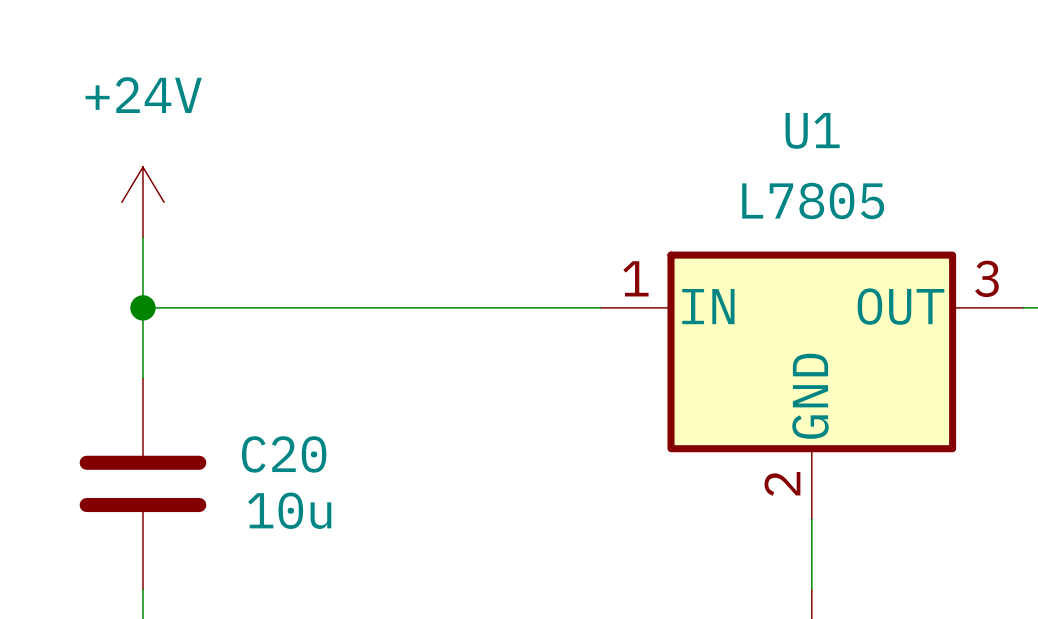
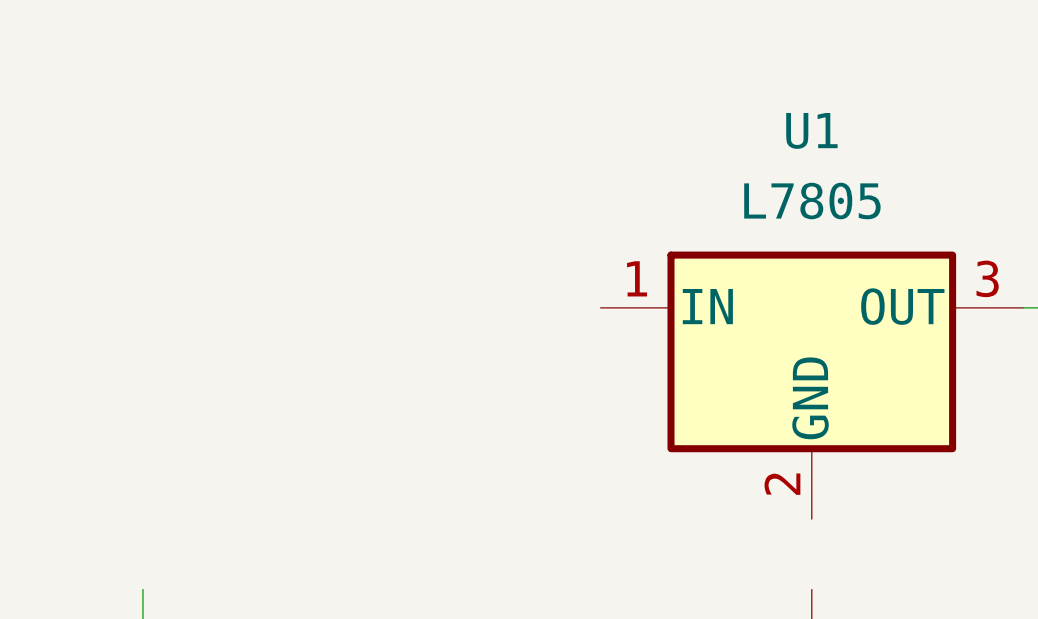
power symbol: +24V (142, 202) -> none
wire: (142, 237) (142, 378) -> none
wire: (142, 307) (600, 307) -> none
junction: (142, 307) -> none
C20: 10u (142, 483) -> none
wire: (811, 519) (811, 589) -> none

